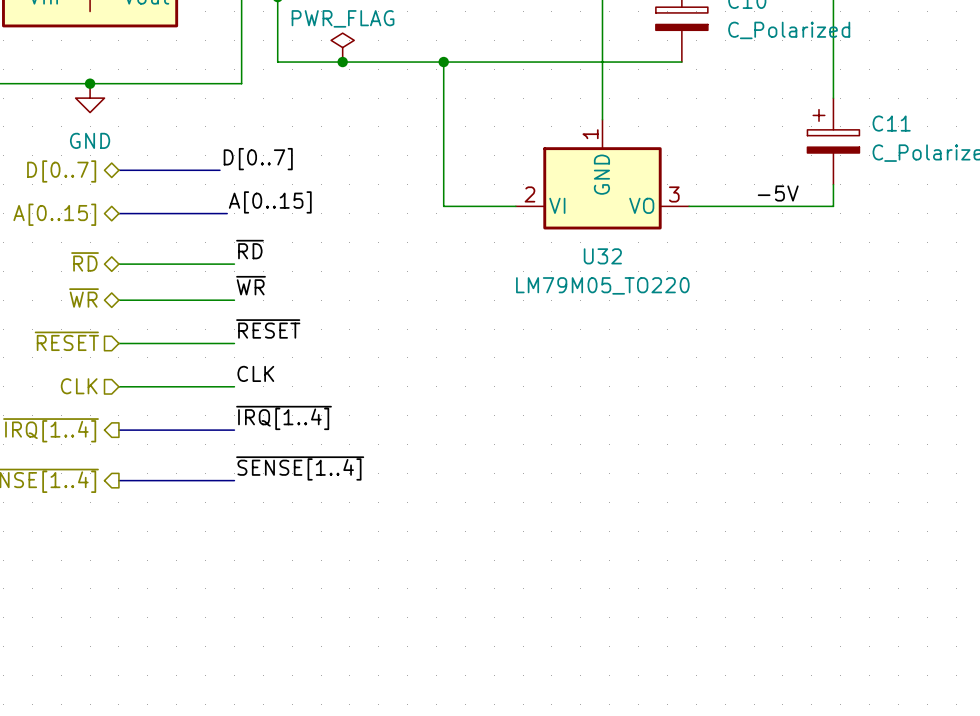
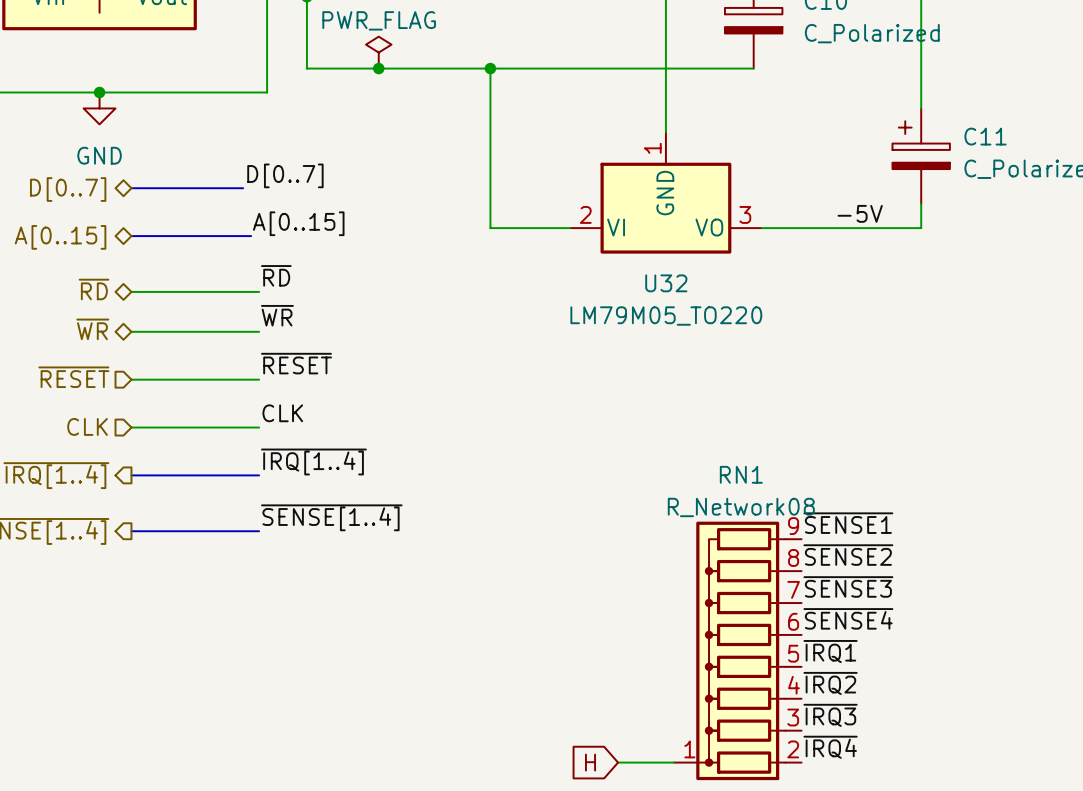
label: none -> ~{SENSE1} (848, 523)
label: none -> ~{SENSE2} (848, 555)
label: none -> ~{SENSE3} (848, 586)
label: none -> ~{SENSE4} (848, 618)
RN1: none -> R_Network08 (737, 650)
label: none -> ~{IRQ1} (830, 651)
label: none -> ~{IRQ2} (830, 683)
label: none -> ~{IRQ3} (830, 715)
label: none -> ~{IRQ4} (830, 747)
global label: none -> H (590, 762)
wire: none -> (618, 762) (673, 762)

